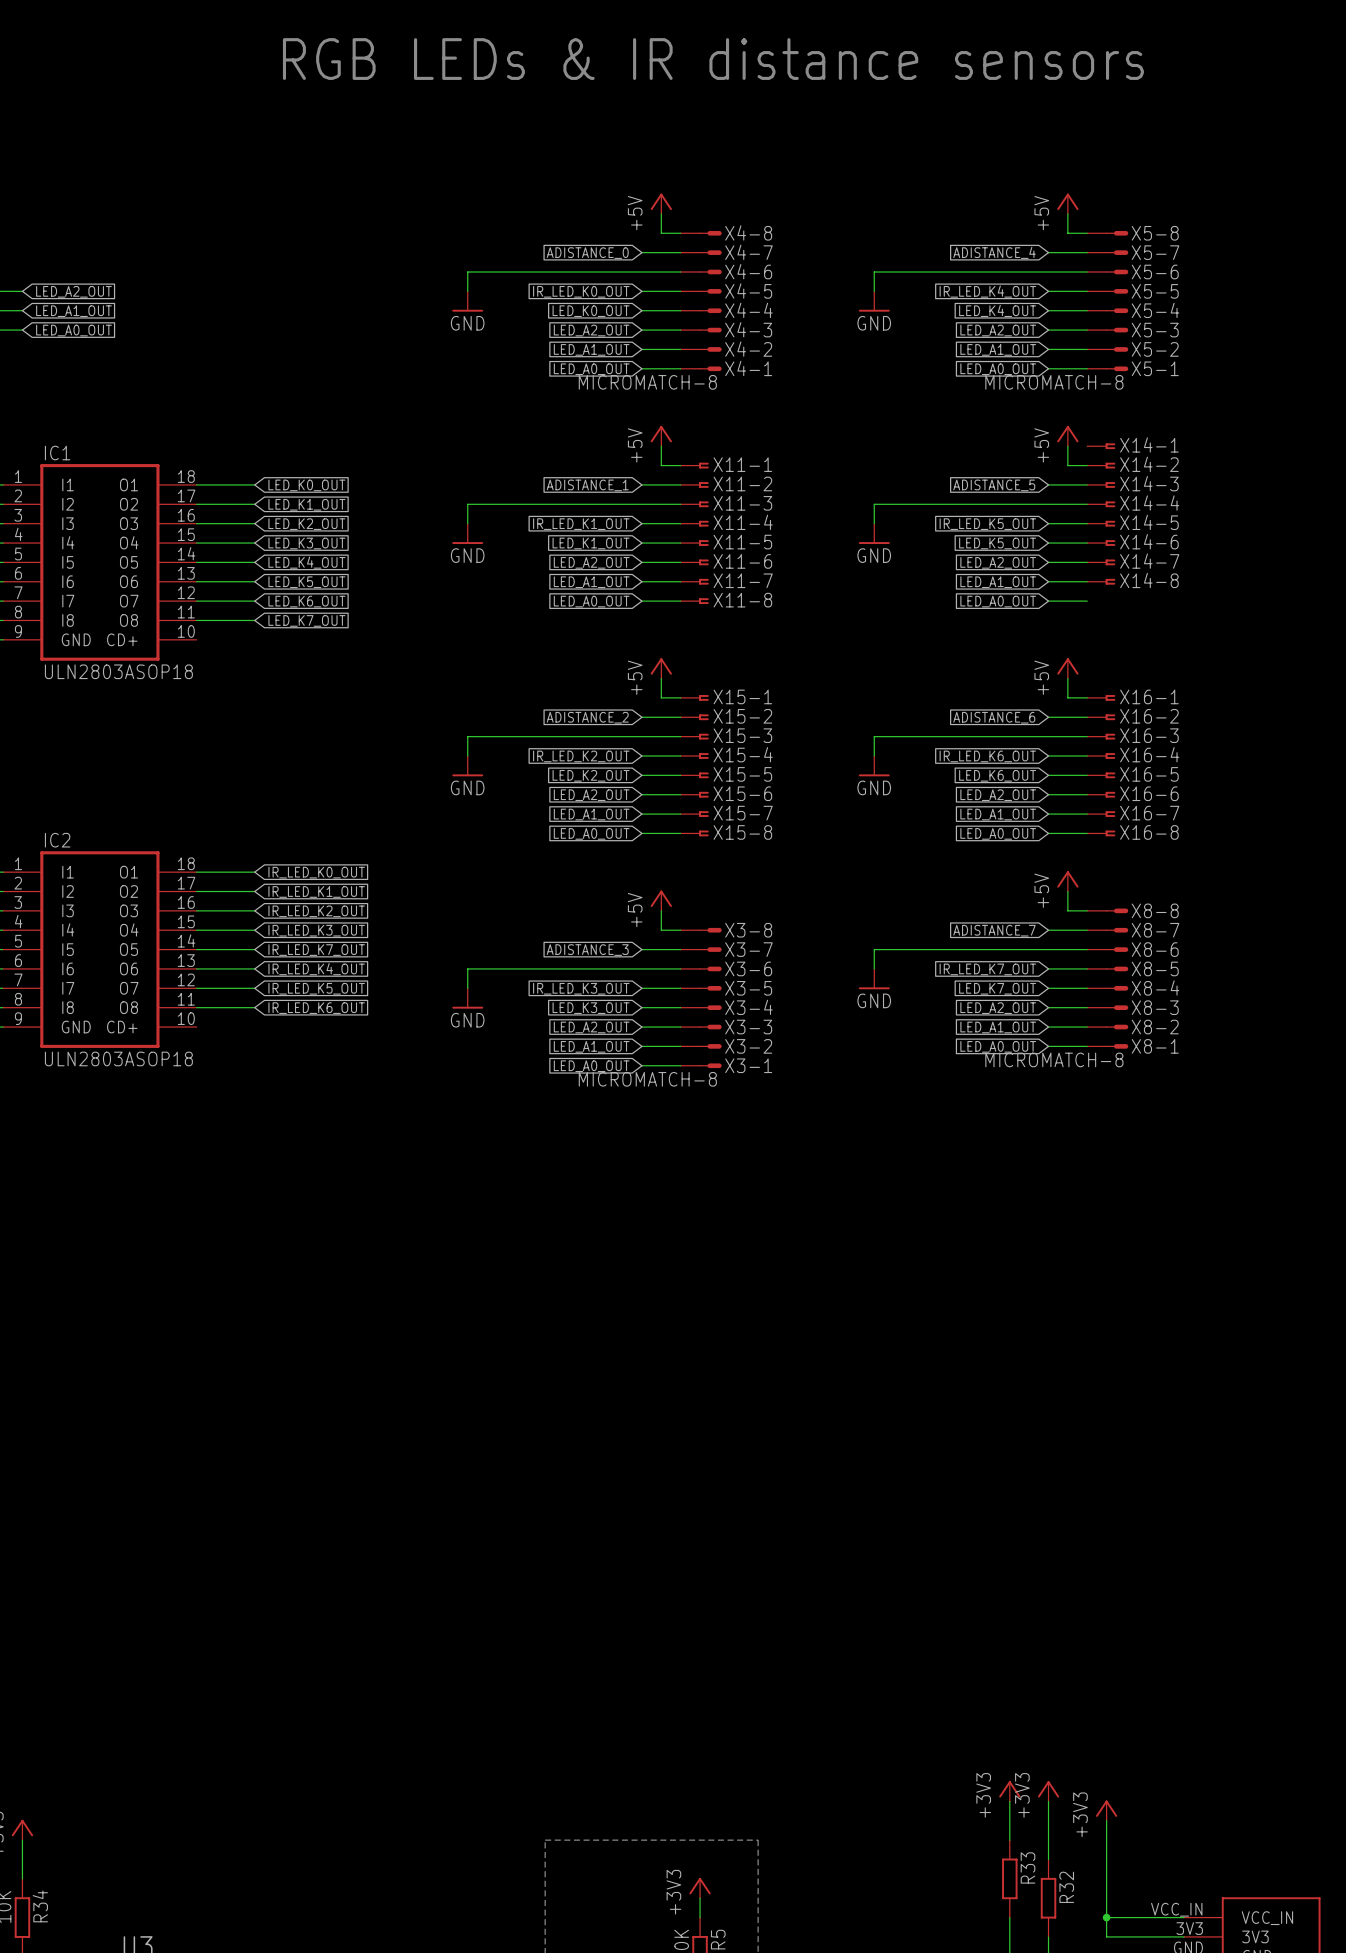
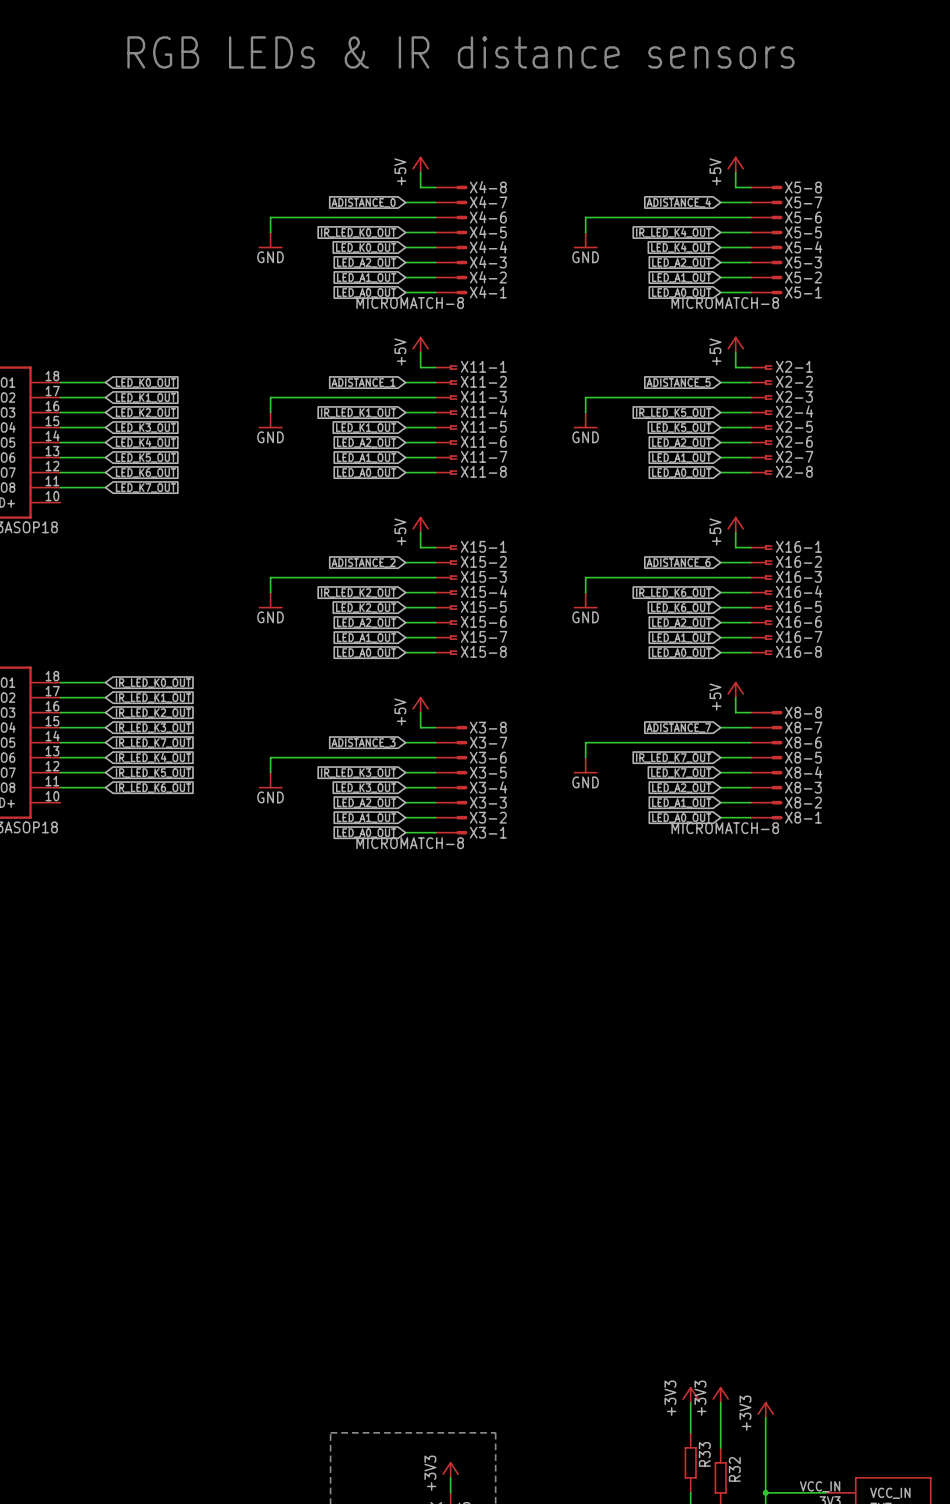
X14-1: (1101, 446) -> none
X14-2 name: X14-2 (1149, 464) -> X2-1 (794, 366)
X14-3 name: X14-3 (1149, 483) -> X2-2 (794, 381)
X14-4 name: X14-4 (1149, 503) -> X2-3 (794, 396)
X14-5 name: X14-5 (1149, 522) -> X2-4 (794, 411)
X14-6 name: X14-6 (1149, 541) -> X2-5 (794, 426)
X14-7 name: X14-7 (1149, 561) -> X2-6 (794, 441)
X14-8 name: X14-8 (1149, 580) -> X2-7 (794, 456)
X2-8: none -> (761, 472)

